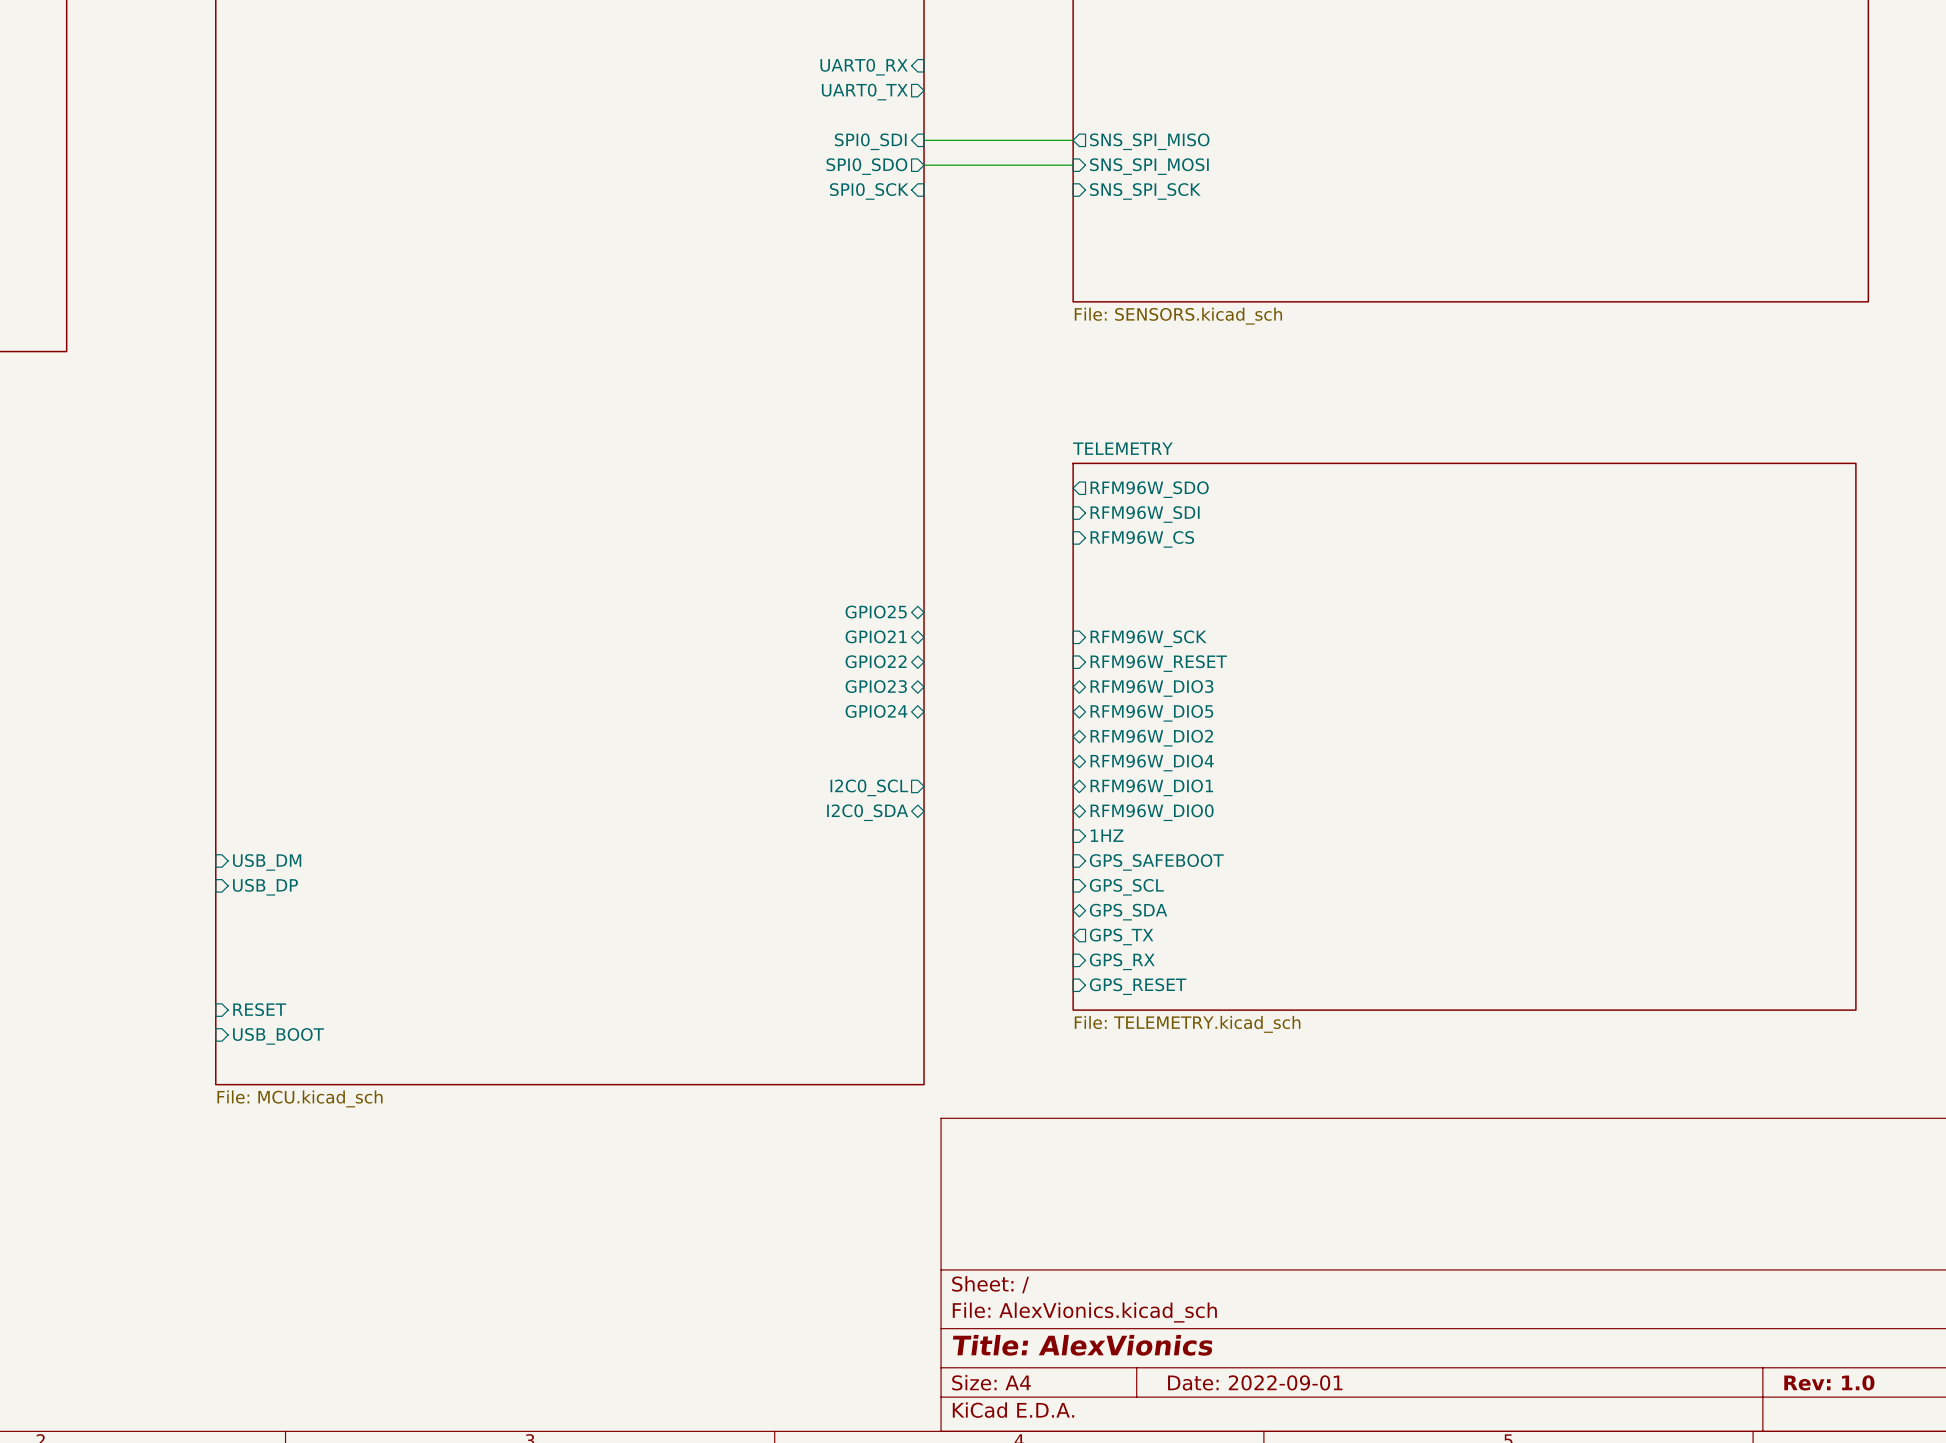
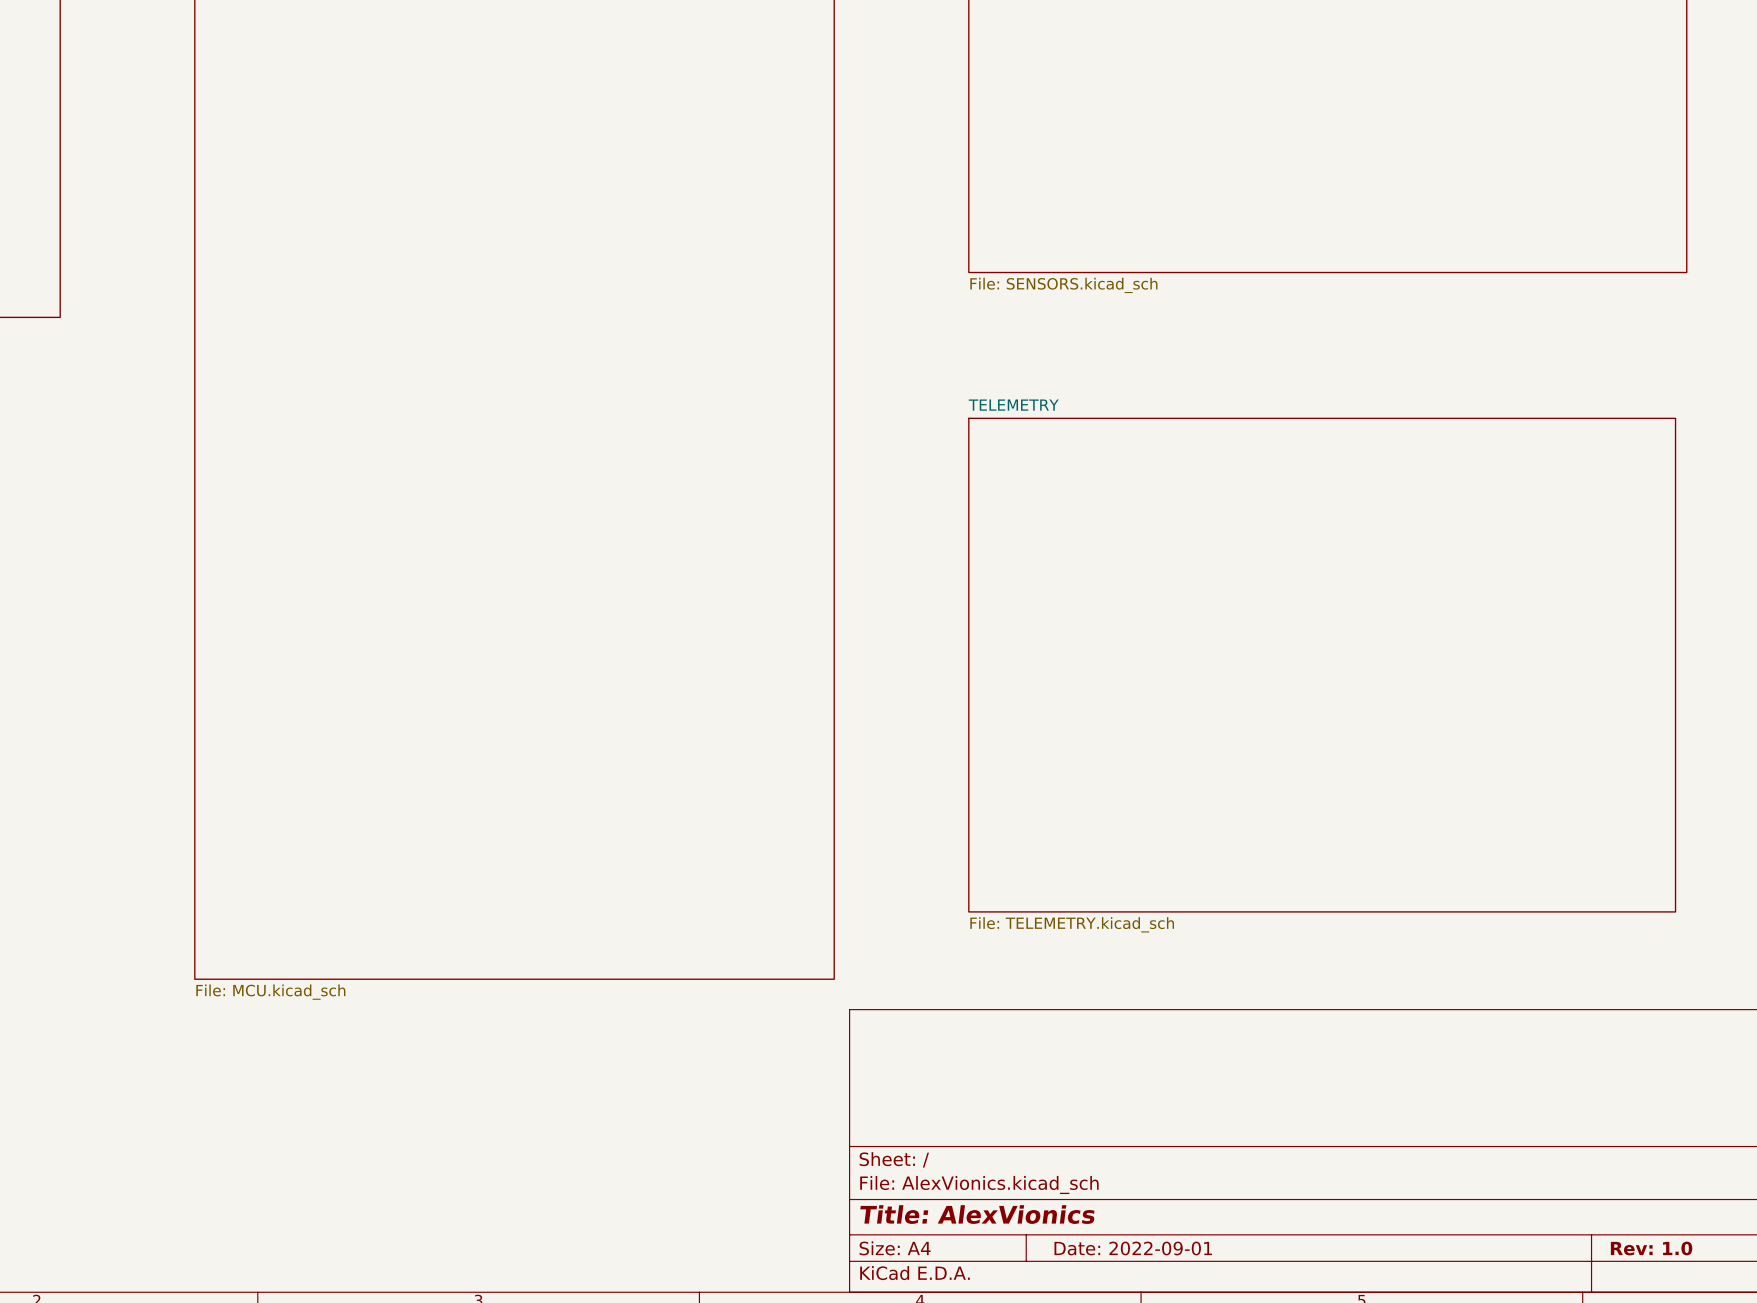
sheet pin: UART0_RX (864, 67) -> none
sheet pin: UART0_TX (864, 92) -> none
wire: (924, 140) (1073, 140) -> none
sheet pin: SPI0_SDI (870, 141) -> none
sheet pin: SNS_SPI_MISO (1149, 141) -> none
wire: (924, 165) (1073, 165) -> none
sheet pin: SPI0_SDO (866, 166) -> none
sheet pin: SNS_SPI_MOSI (1149, 166) -> none
sheet pin: SPI0_SCK (869, 191) -> none
sheet pin: SNS_SPI_SCK (1145, 191) -> none
sheet pin: RFM96W_SDO (1149, 489) -> none
sheet pin: RFM96W_SDI (1145, 514) -> none
sheet pin: RFM96W_CS (1142, 539) -> none
sheet pin: GPIO25 (876, 612) -> none
sheet pin: GPIO21 (876, 636) -> none
sheet pin: RFM96W_SCK (1148, 638) -> none
sheet pin: GPIO22 (876, 661) -> none
sheet pin: RFM96W_RESET (1158, 663) -> none
sheet pin: GPIO23 (876, 686) -> none
sheet pin: RFM96W_DIO3 (1151, 688) -> none
sheet pin: GPIO24 (876, 711) -> none
sheet pin: RFM96W_DIO5 (1151, 713) -> none
sheet pin: RFM96W_DIO2 (1151, 738) -> none
sheet pin: RFM96W_DIO4 (1152, 763) -> none
sheet pin: I2C0_SCL (869, 787) -> none
sheet pin: RFM96W_DIO1 (1151, 787) -> none
sheet pin: I2C0_SDA (867, 812) -> none
sheet pin: RFM96W_DIO0 (1152, 812) -> none
sheet pin: 1HZ (1107, 835) -> none
sheet pin: USB_DM (267, 862) -> none
sheet pin: GPS_SAFEBOOT (1156, 862) -> none
sheet pin: USB_DP (265, 887) -> none
sheet pin: GPS_SCL (1126, 887) -> none
sheet pin: GPS_SDA (1128, 912) -> none
sheet pin: GPS_TX (1121, 936) -> none
sheet pin: GPS_RX (1122, 961) -> none
sheet pin: GPS_RESET (1138, 986) -> none
sheet pin: RESET (259, 1009) -> none
sheet pin: USB_BOOT (278, 1036) -> none

